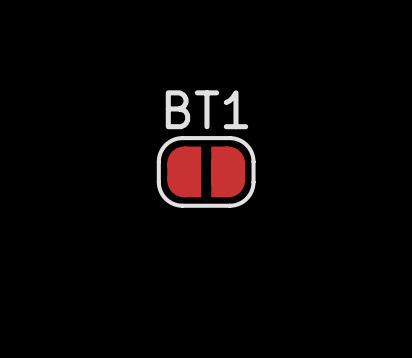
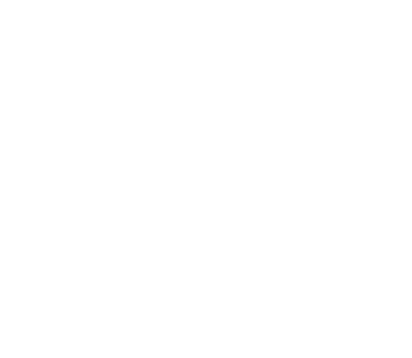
BT1: (206, 171) -> none

